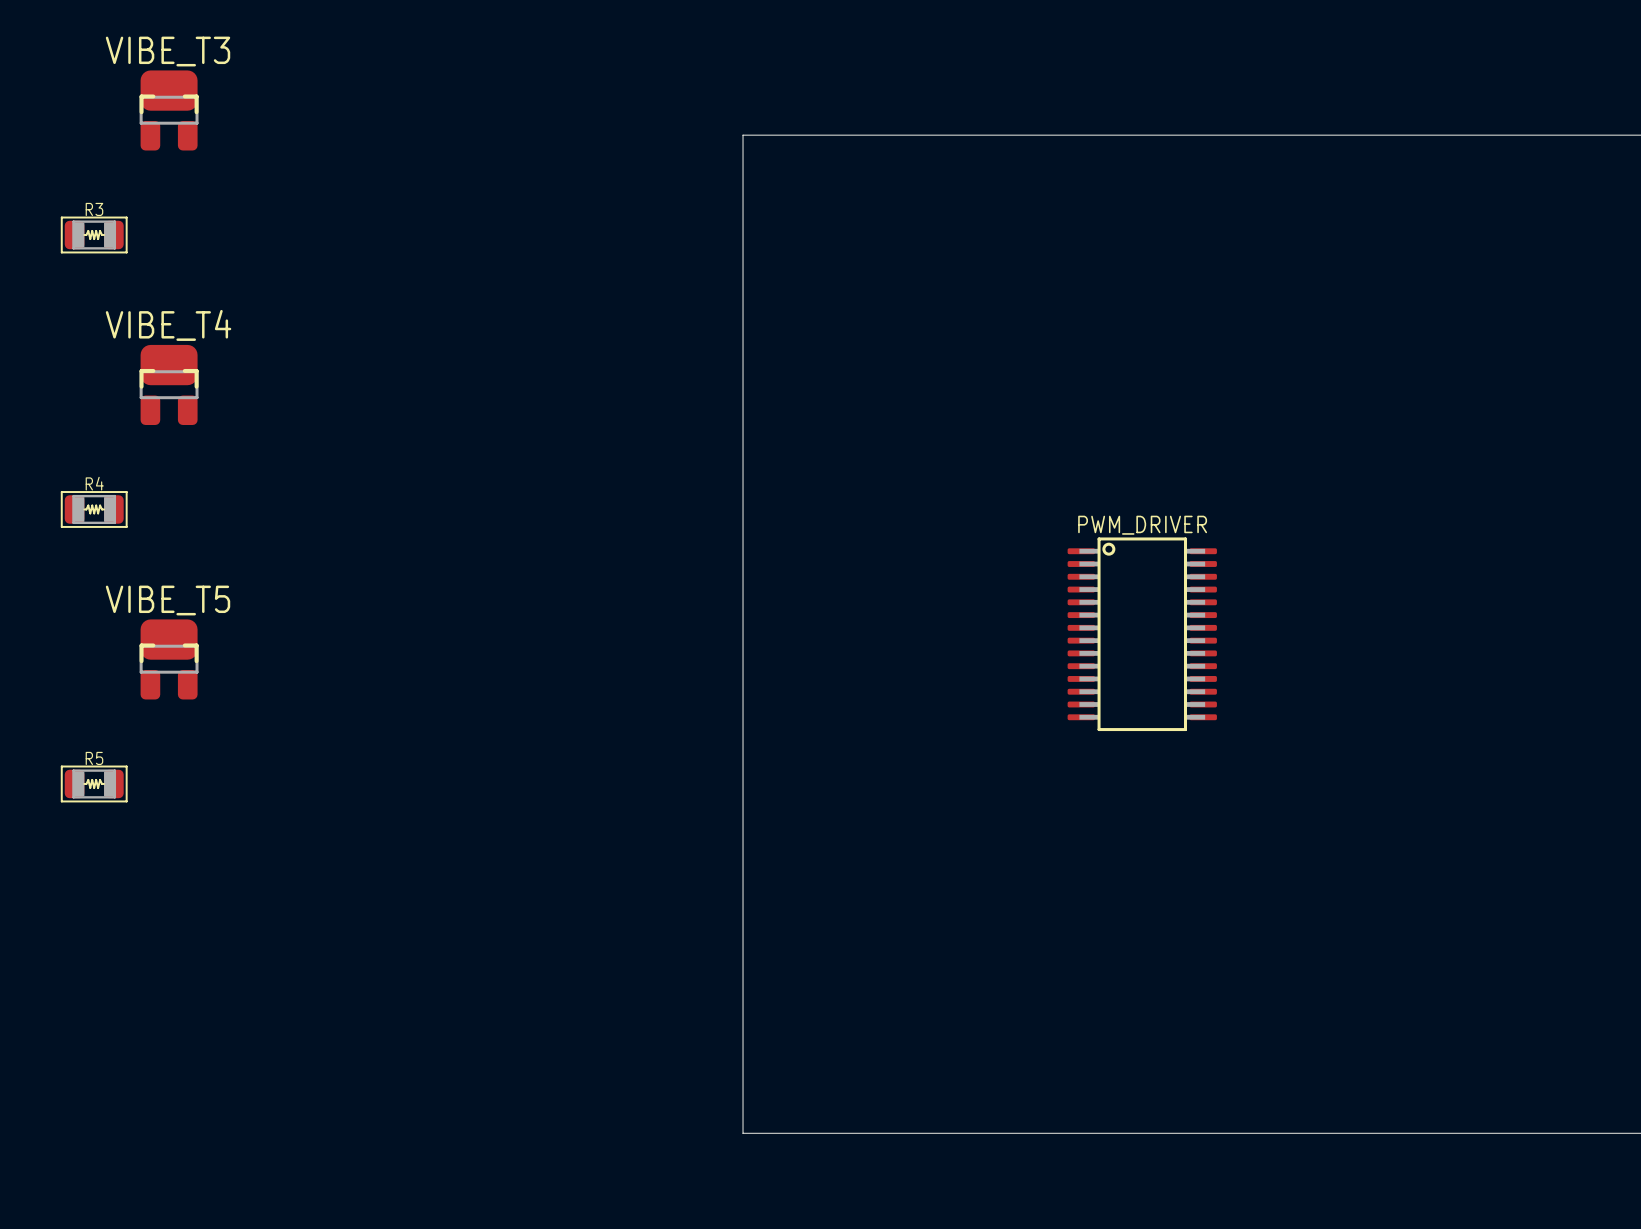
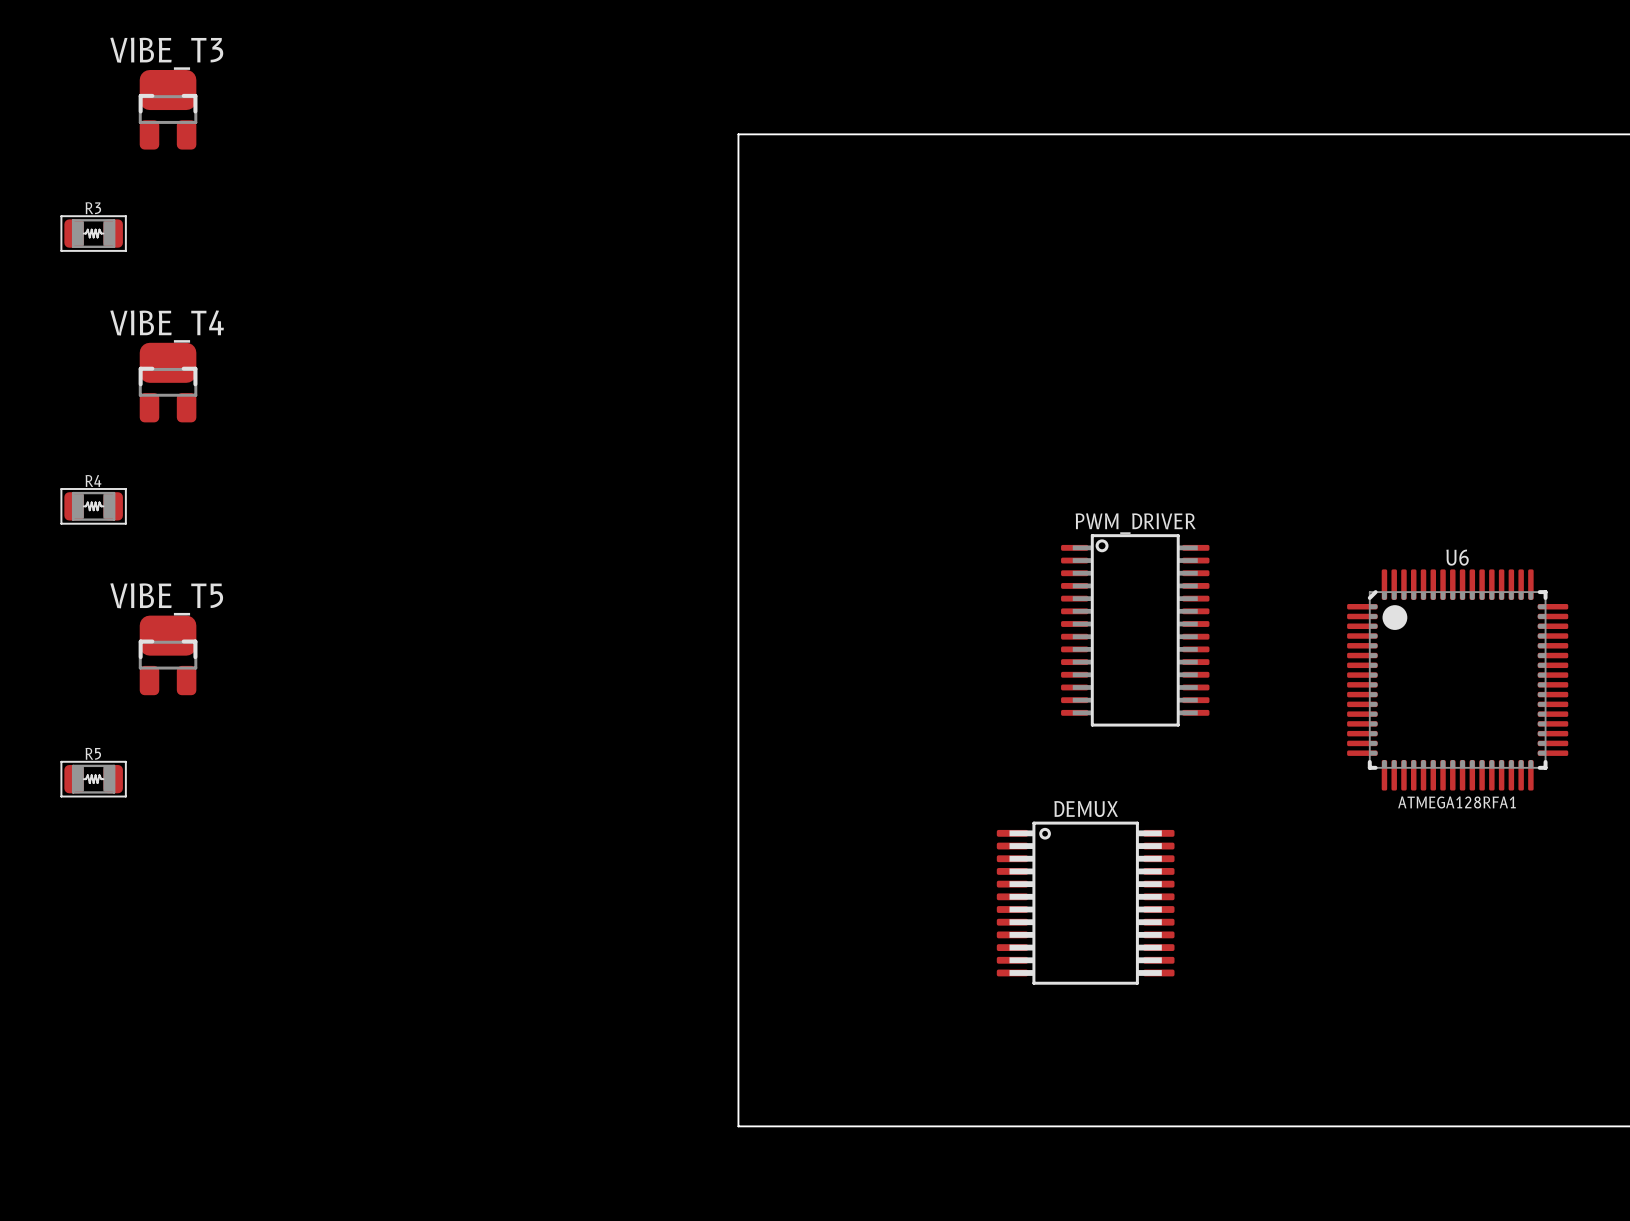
U6: none -> ATMEGA128RFA1 (1457, 679)
DEMUX: none -> (1085, 903)

